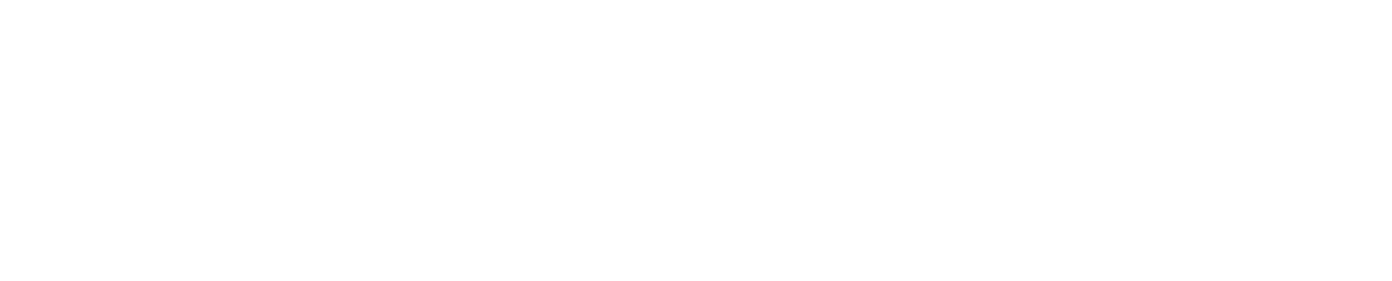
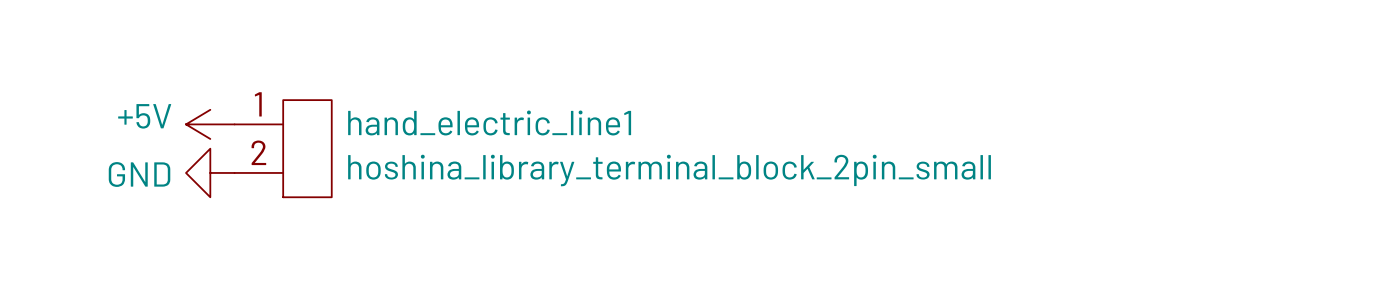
power symbol: none -> +5V (210, 124)
hand_electric_line1: none -> hoshina_library_terminal_block_2pin_small (283, 148)
power symbol: none -> GND (210, 172)

